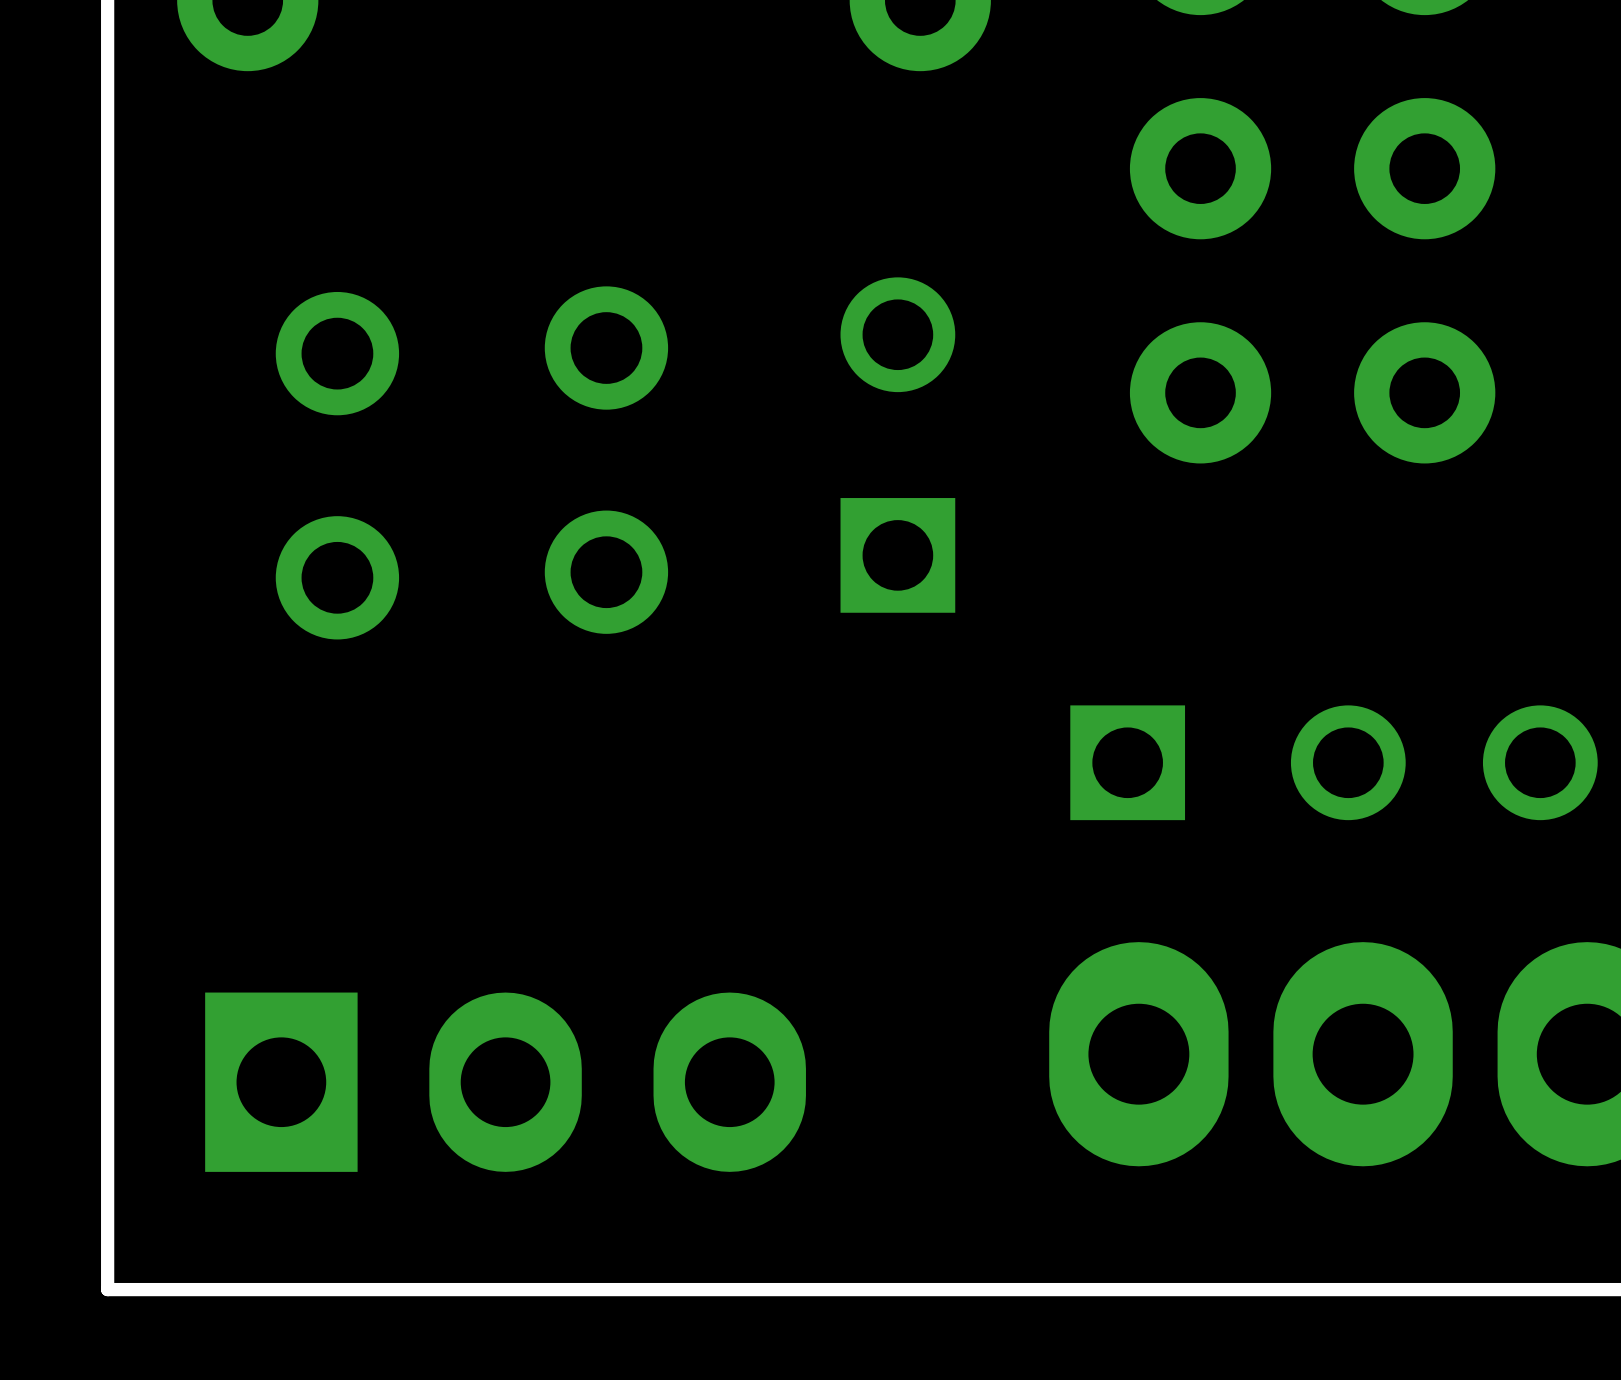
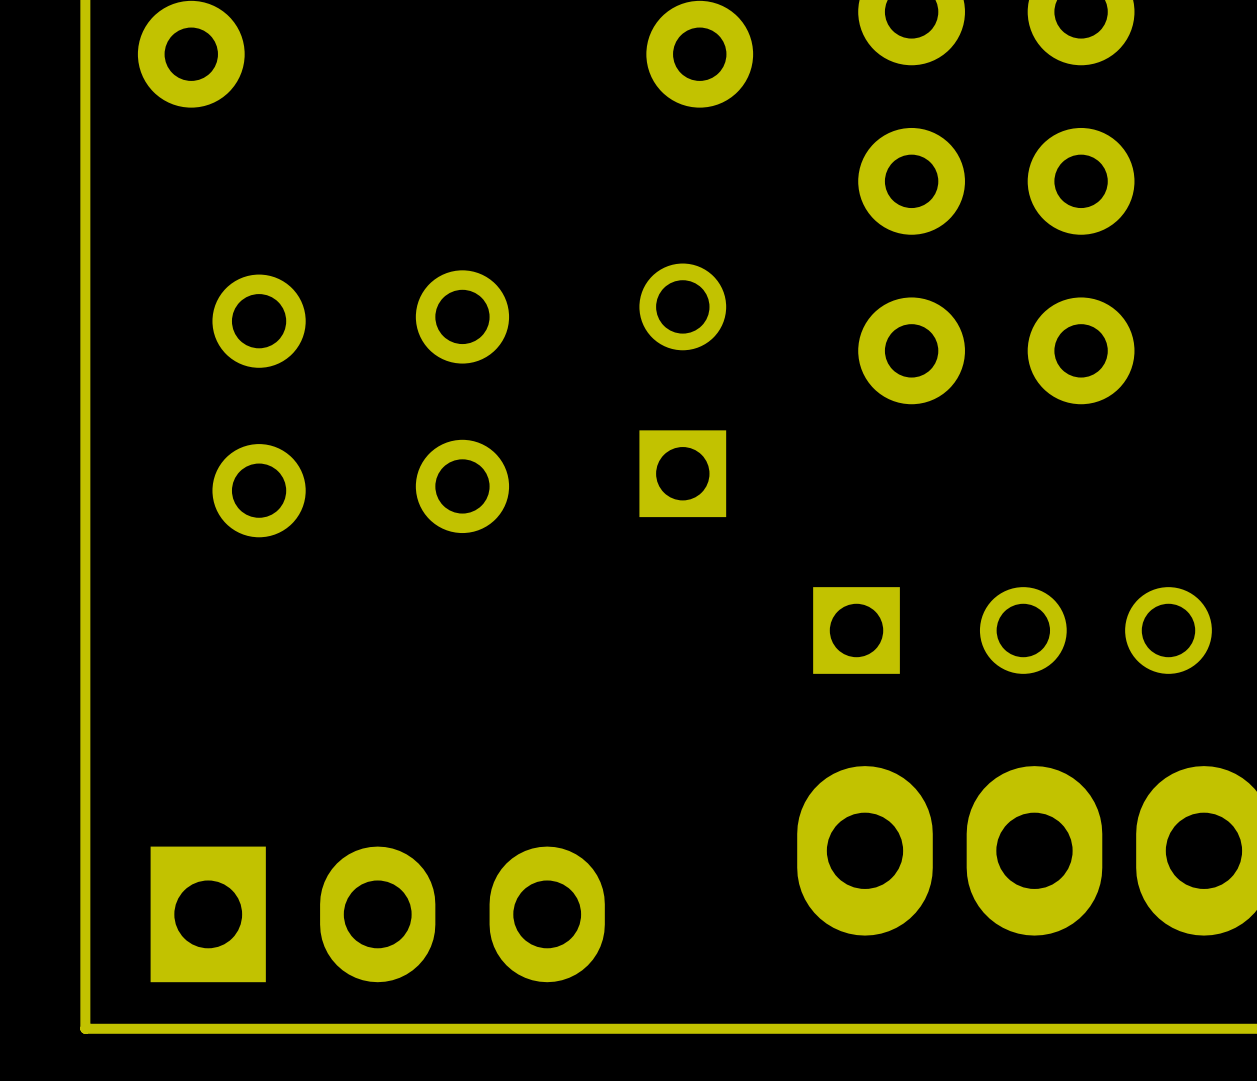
part position: (505, 1082) -> (377, 914)

